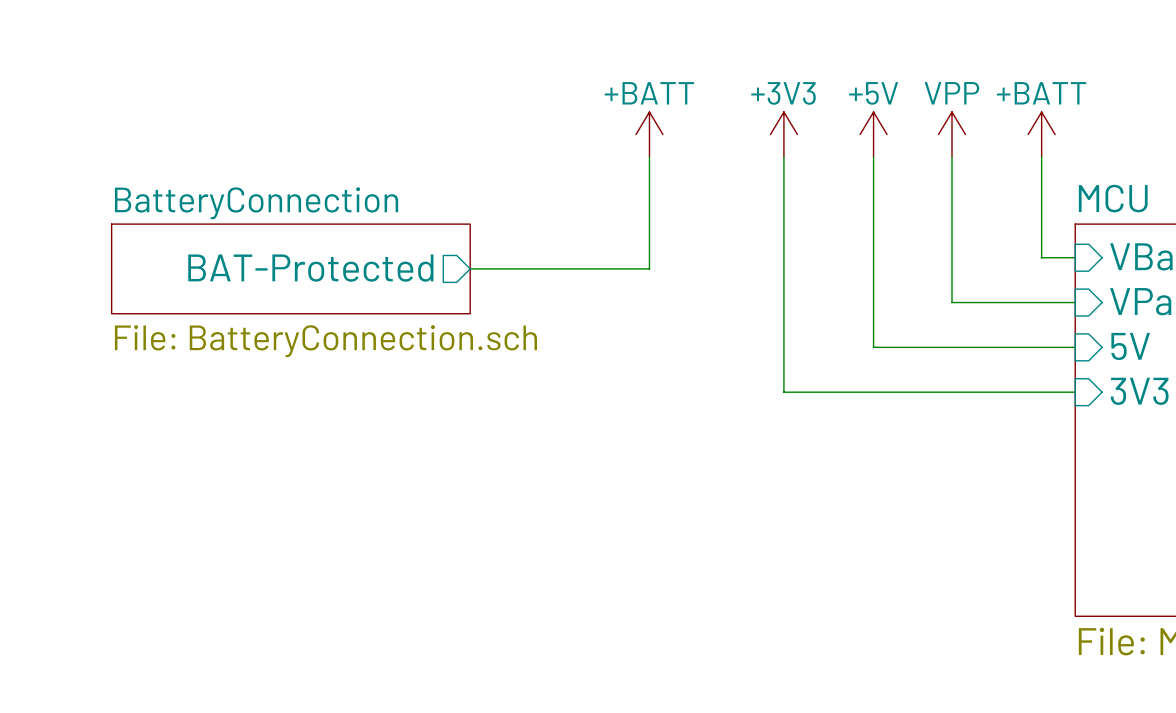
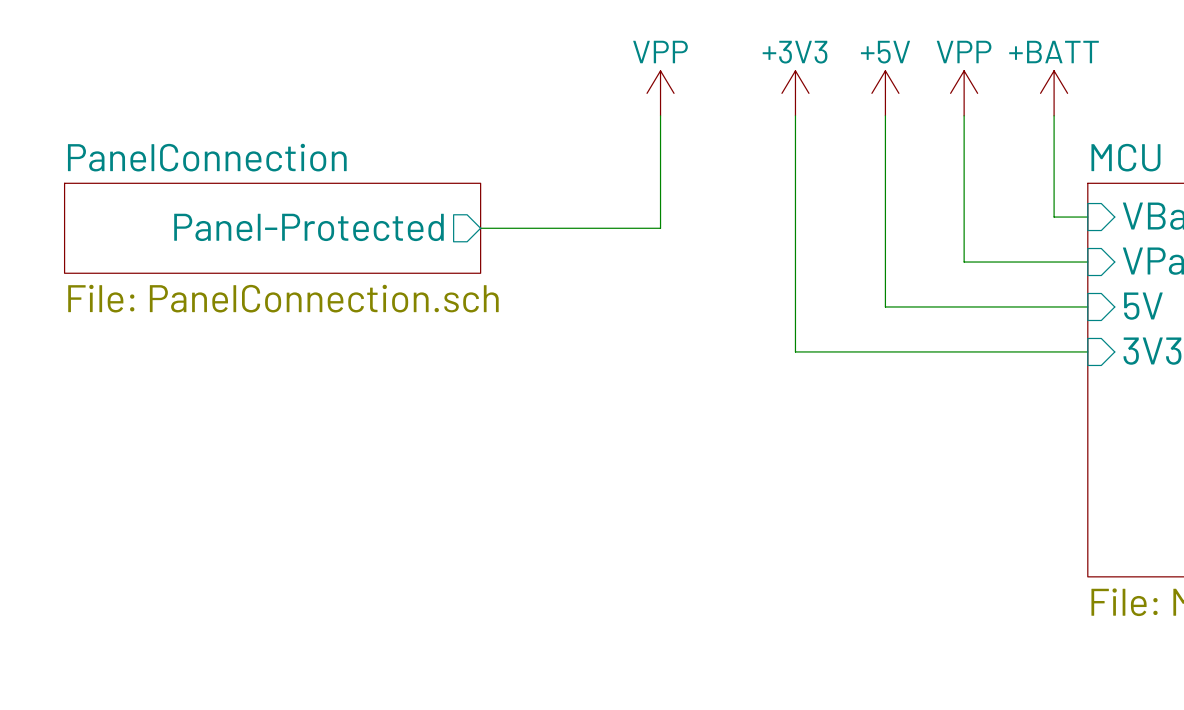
power symbol: +BATT (649, 134) -> VPP (660, 93)
sheet PanelConnection: none -> File: PanelConnection.sch (272, 228)
sheet BatteryConnection: File: BatteryConnection.sch (290, 268) -> none
sheet pin: BAT-Protected (310, 268) -> Panel-Protected (308, 227)

